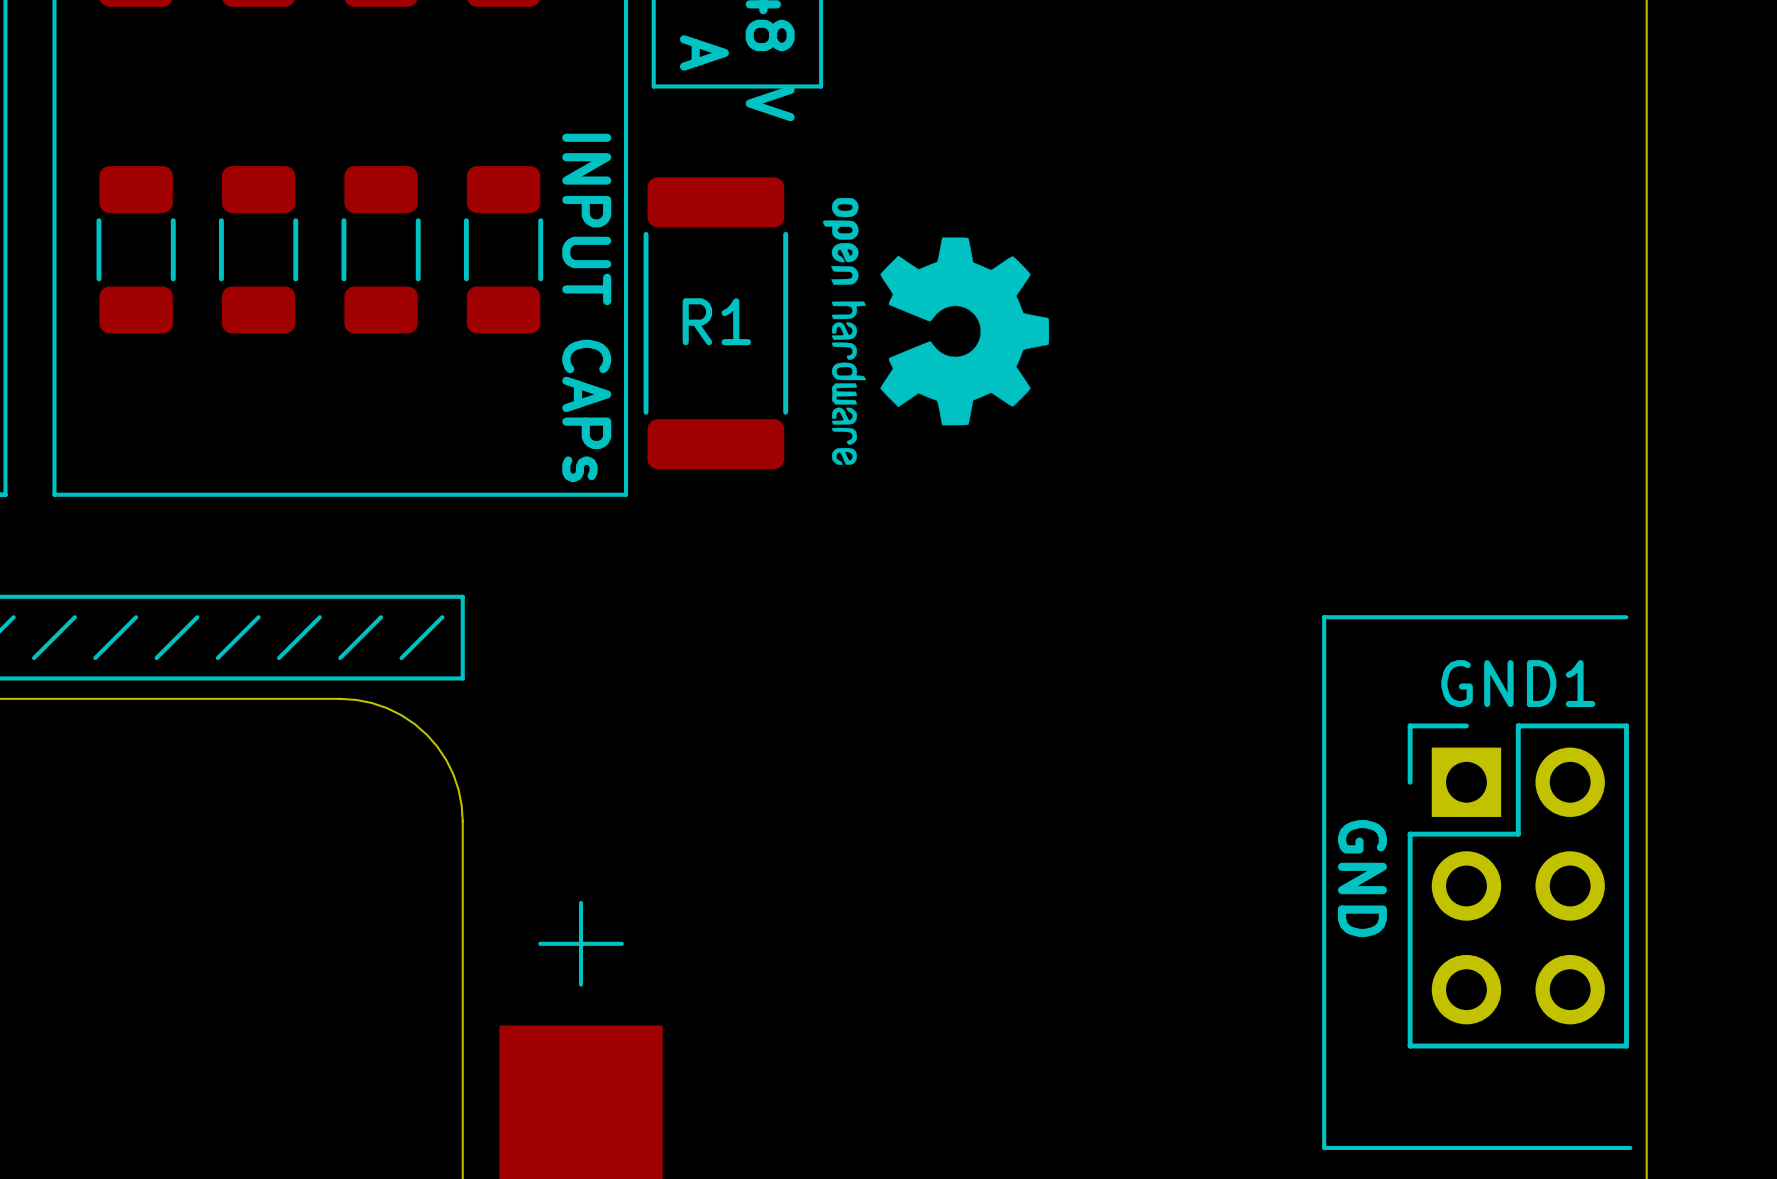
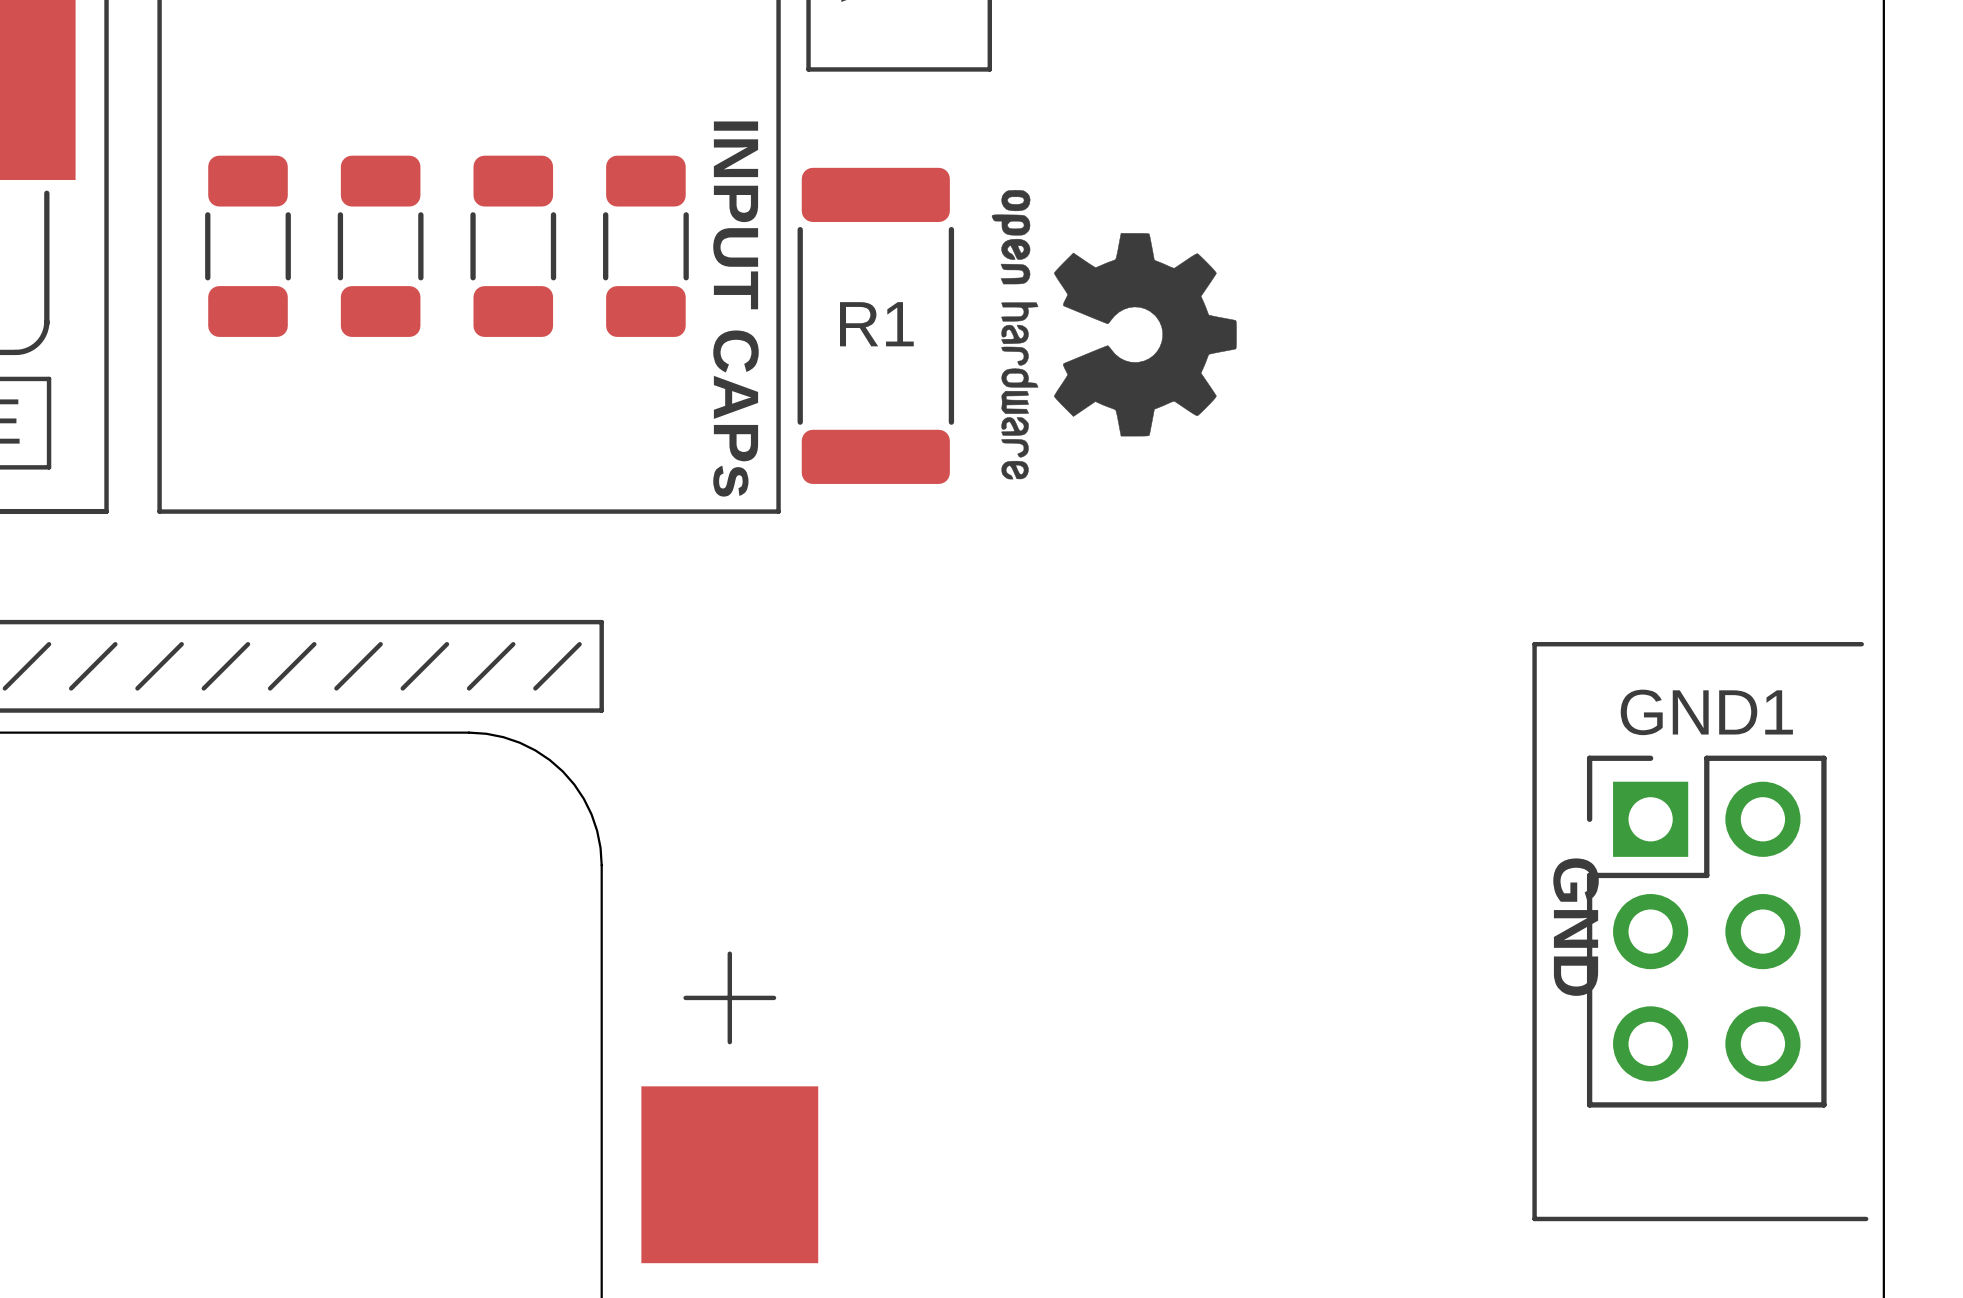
GND1 position: (1518, 885) -> (1706, 931)

